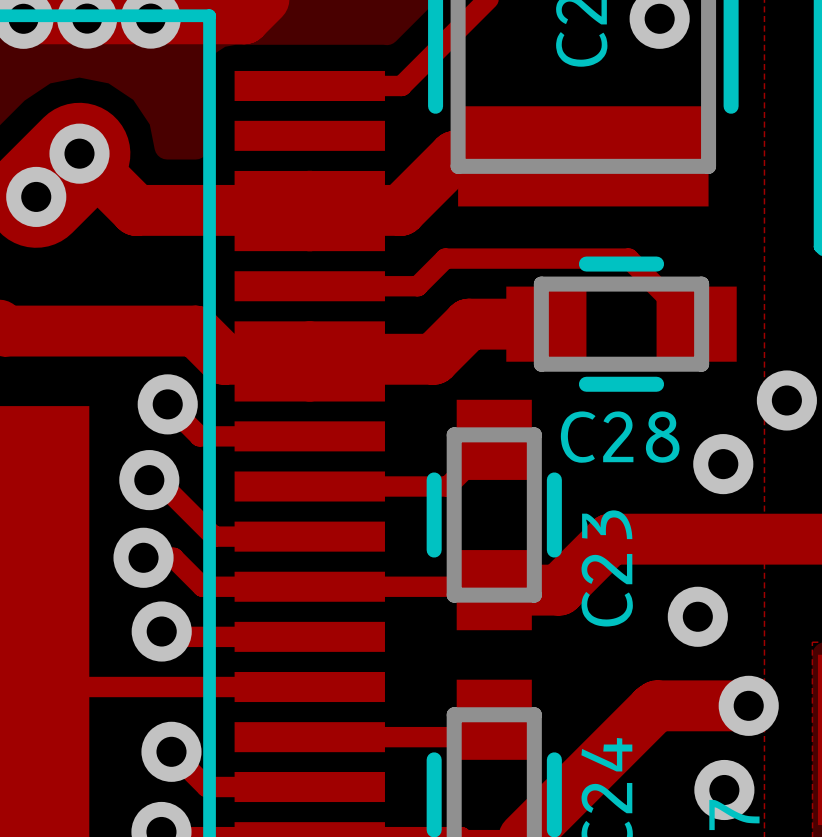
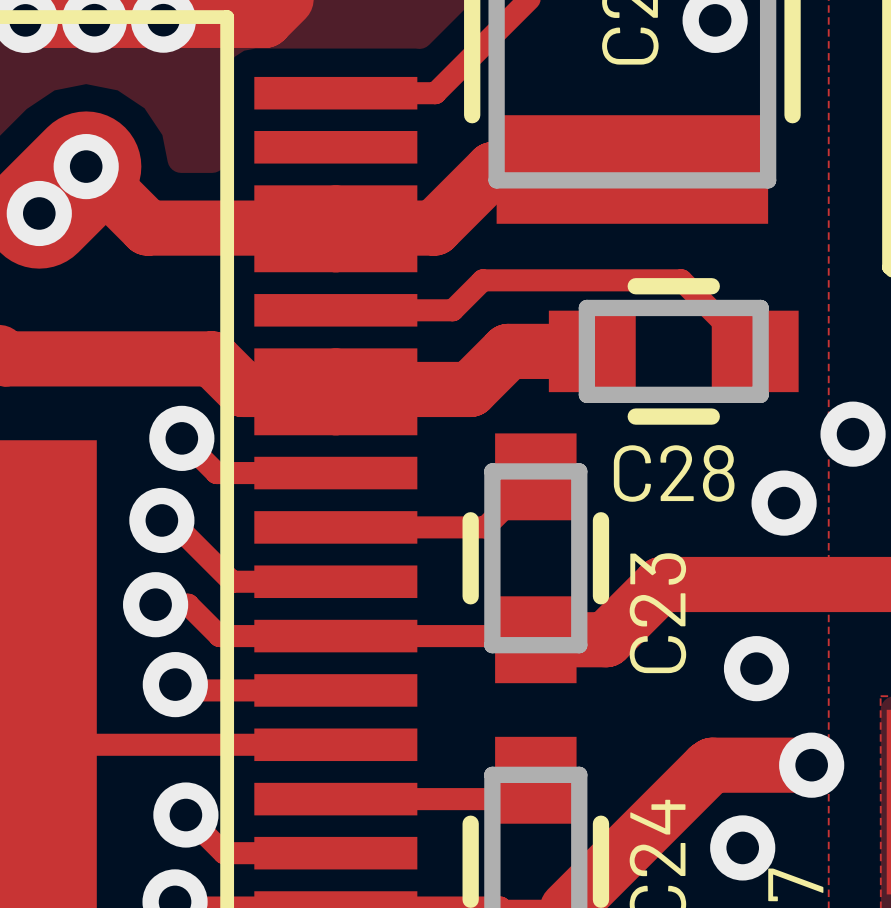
via position: (724, 789) -> (742, 847)

